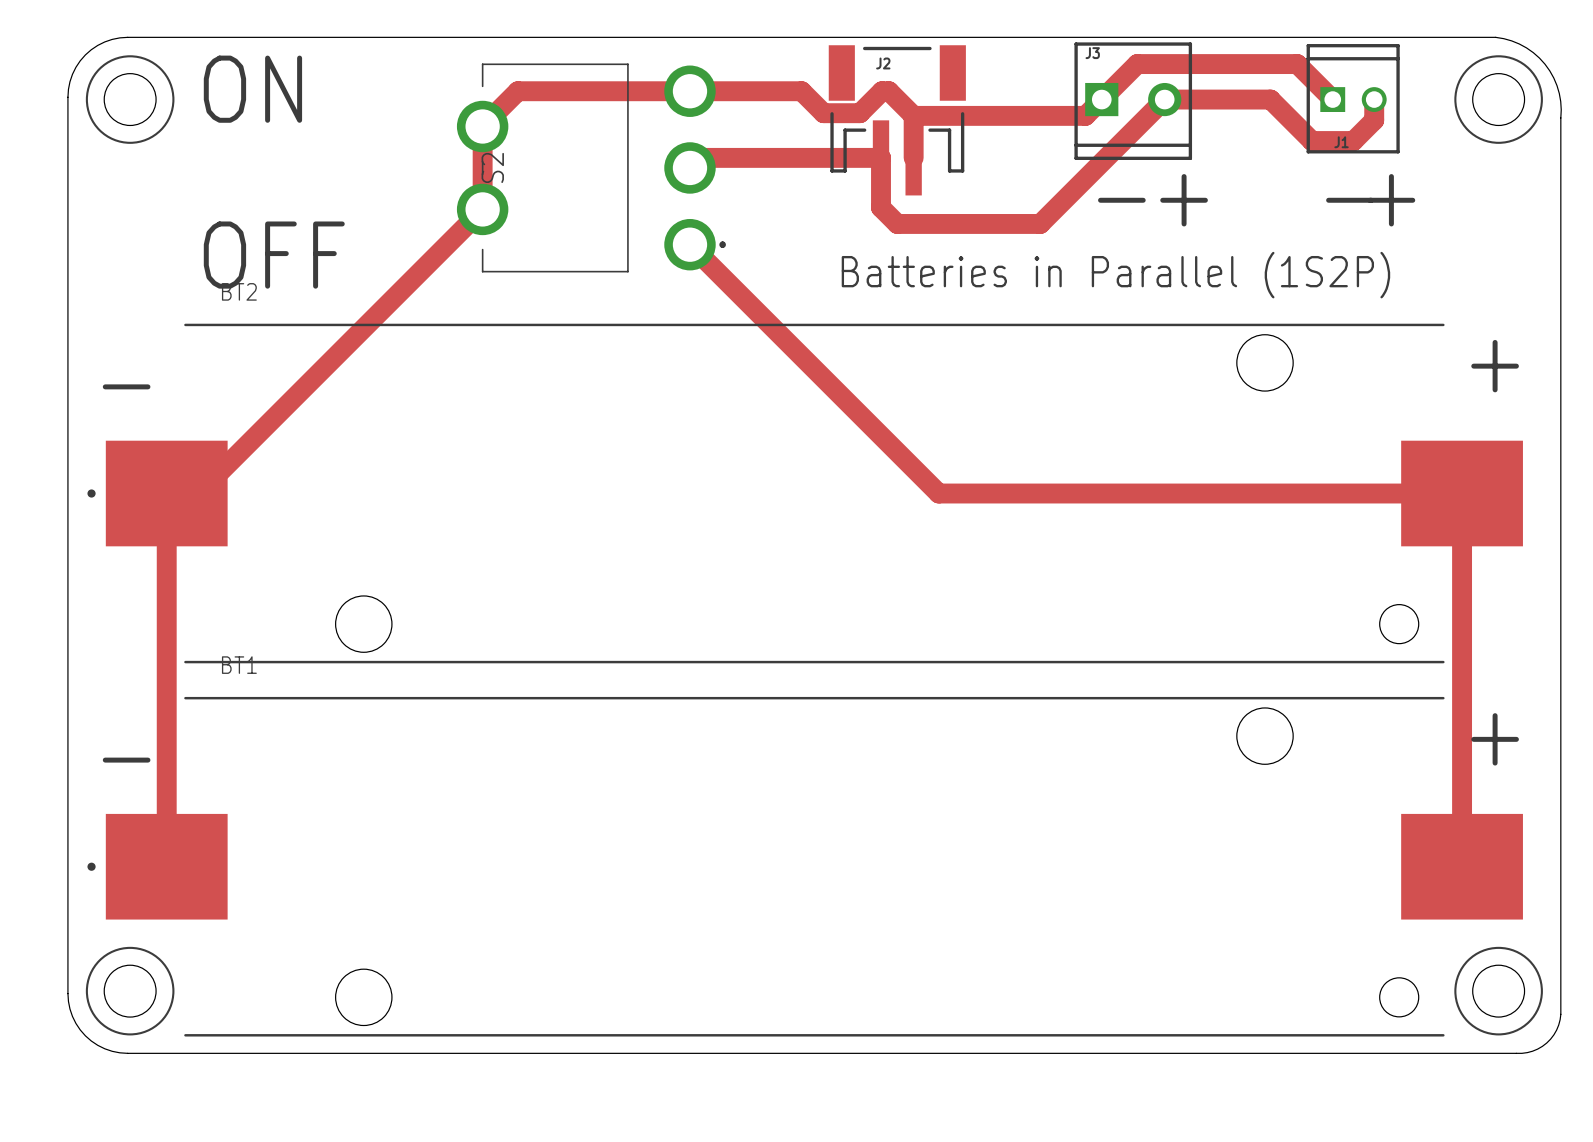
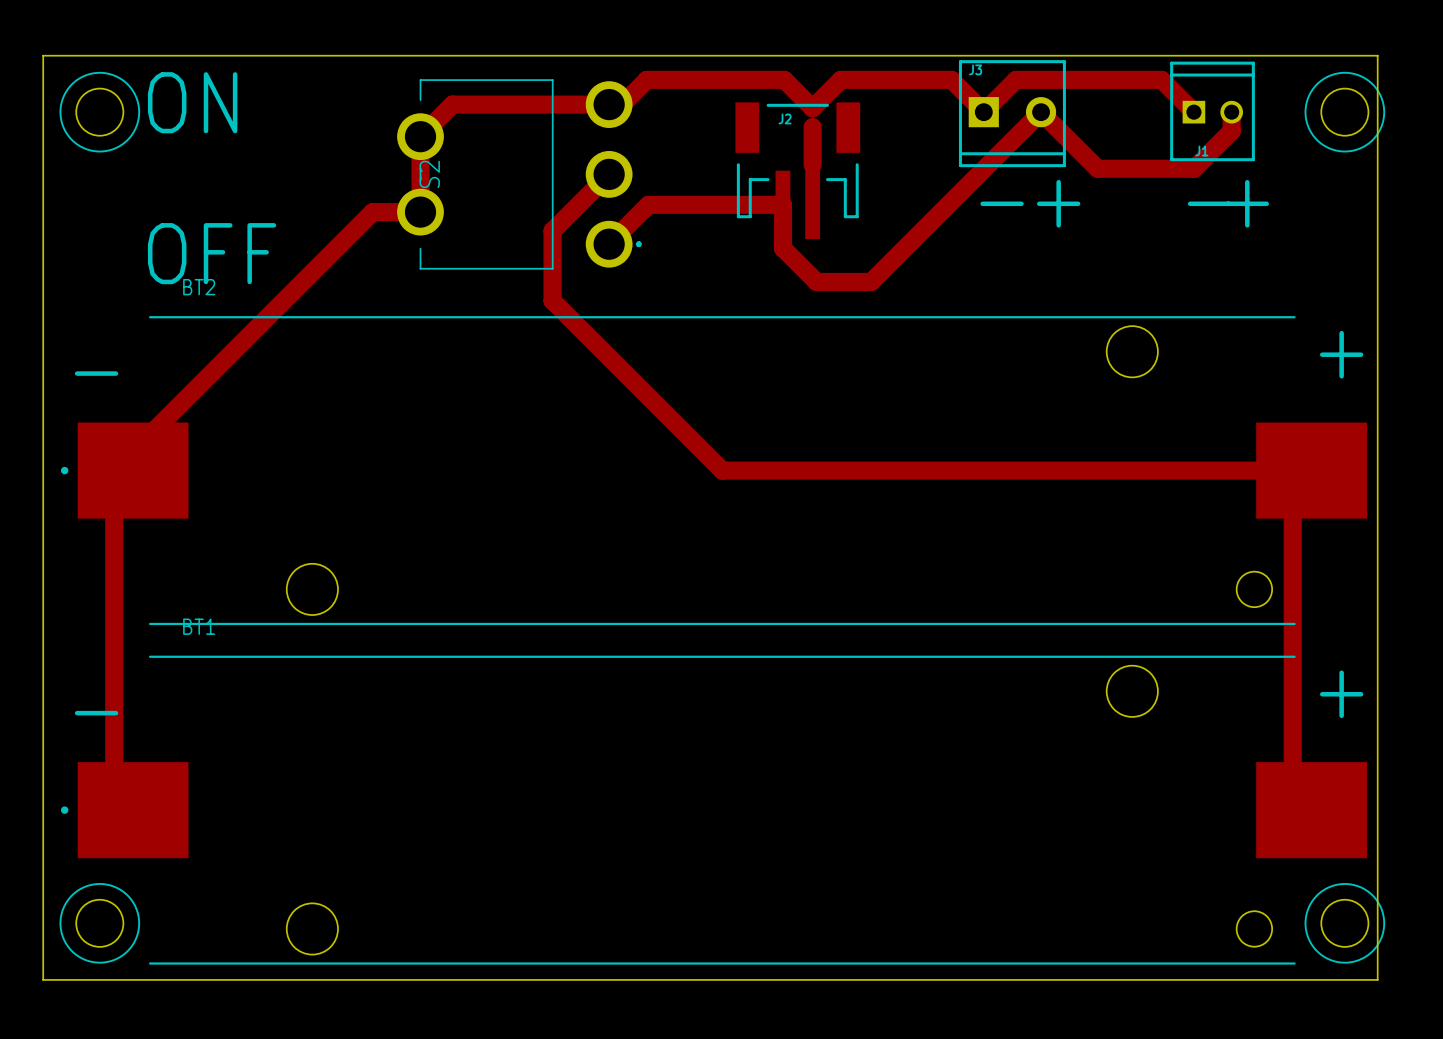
text position: ON (252, 89) -> ON (192, 102)
track: (704, 91) (801, 91) (823, 113) (860, 113) (881, 91) (889, 91) (913, 115) (1085, 115) (1101, 99) -> (622, 104) (646, 79) (784, 79) (812, 108) (840, 79) (951, 79) (983, 112)
board edge: (67, 97) (72, 74) (85, 54) (104, 41) (127, 37) (1495, 37) (1511, 40) (1526, 47) (1539, 58) (1549, 70) (1559, 93) (1561, 109) (1560, 1014) (1556, 1030) (1546, 1043) (1532, 1051) (1516, 1053) -> (43, 110) (43, 55) (1377, 55) (1377, 979) (1361, 979)
track: (1164, 99) (1270, 99) (1312, 141) (1353, 141) -> (1041, 112) (1097, 168) (1193, 168) (1212, 149)
J2 position: (897, 120) -> (797, 170)
track: (689, 167) (700, 157) (881, 157) (881, 201) -> (609, 244) (648, 204) (782, 204)
track: (881, 207) (897, 223) (1040, 223) -> (782, 210) (782, 248) (816, 281) (871, 281) (927, 225)
track: (482, 209) (211, 479) (191, 490) (166, 493) (166, 866) -> (420, 212) (372, 212) (114, 470) (114, 810)
track: (689, 244) (938, 493) -> (609, 174) (552, 230) (552, 300) (722, 470) (835, 470)
text position: OFF (274, 255) -> OFF (212, 253)
text: Batteries in Parallel (1S2P) (1115, 275) -> none
track: (1441, 493) (1462, 493) (1462, 866) -> (1292, 470) (1292, 810)
board edge: (67, 993) (72, 1016) (85, 1035) (104, 1048) (127, 1053) -> (43, 925) (43, 979) (97, 979)

